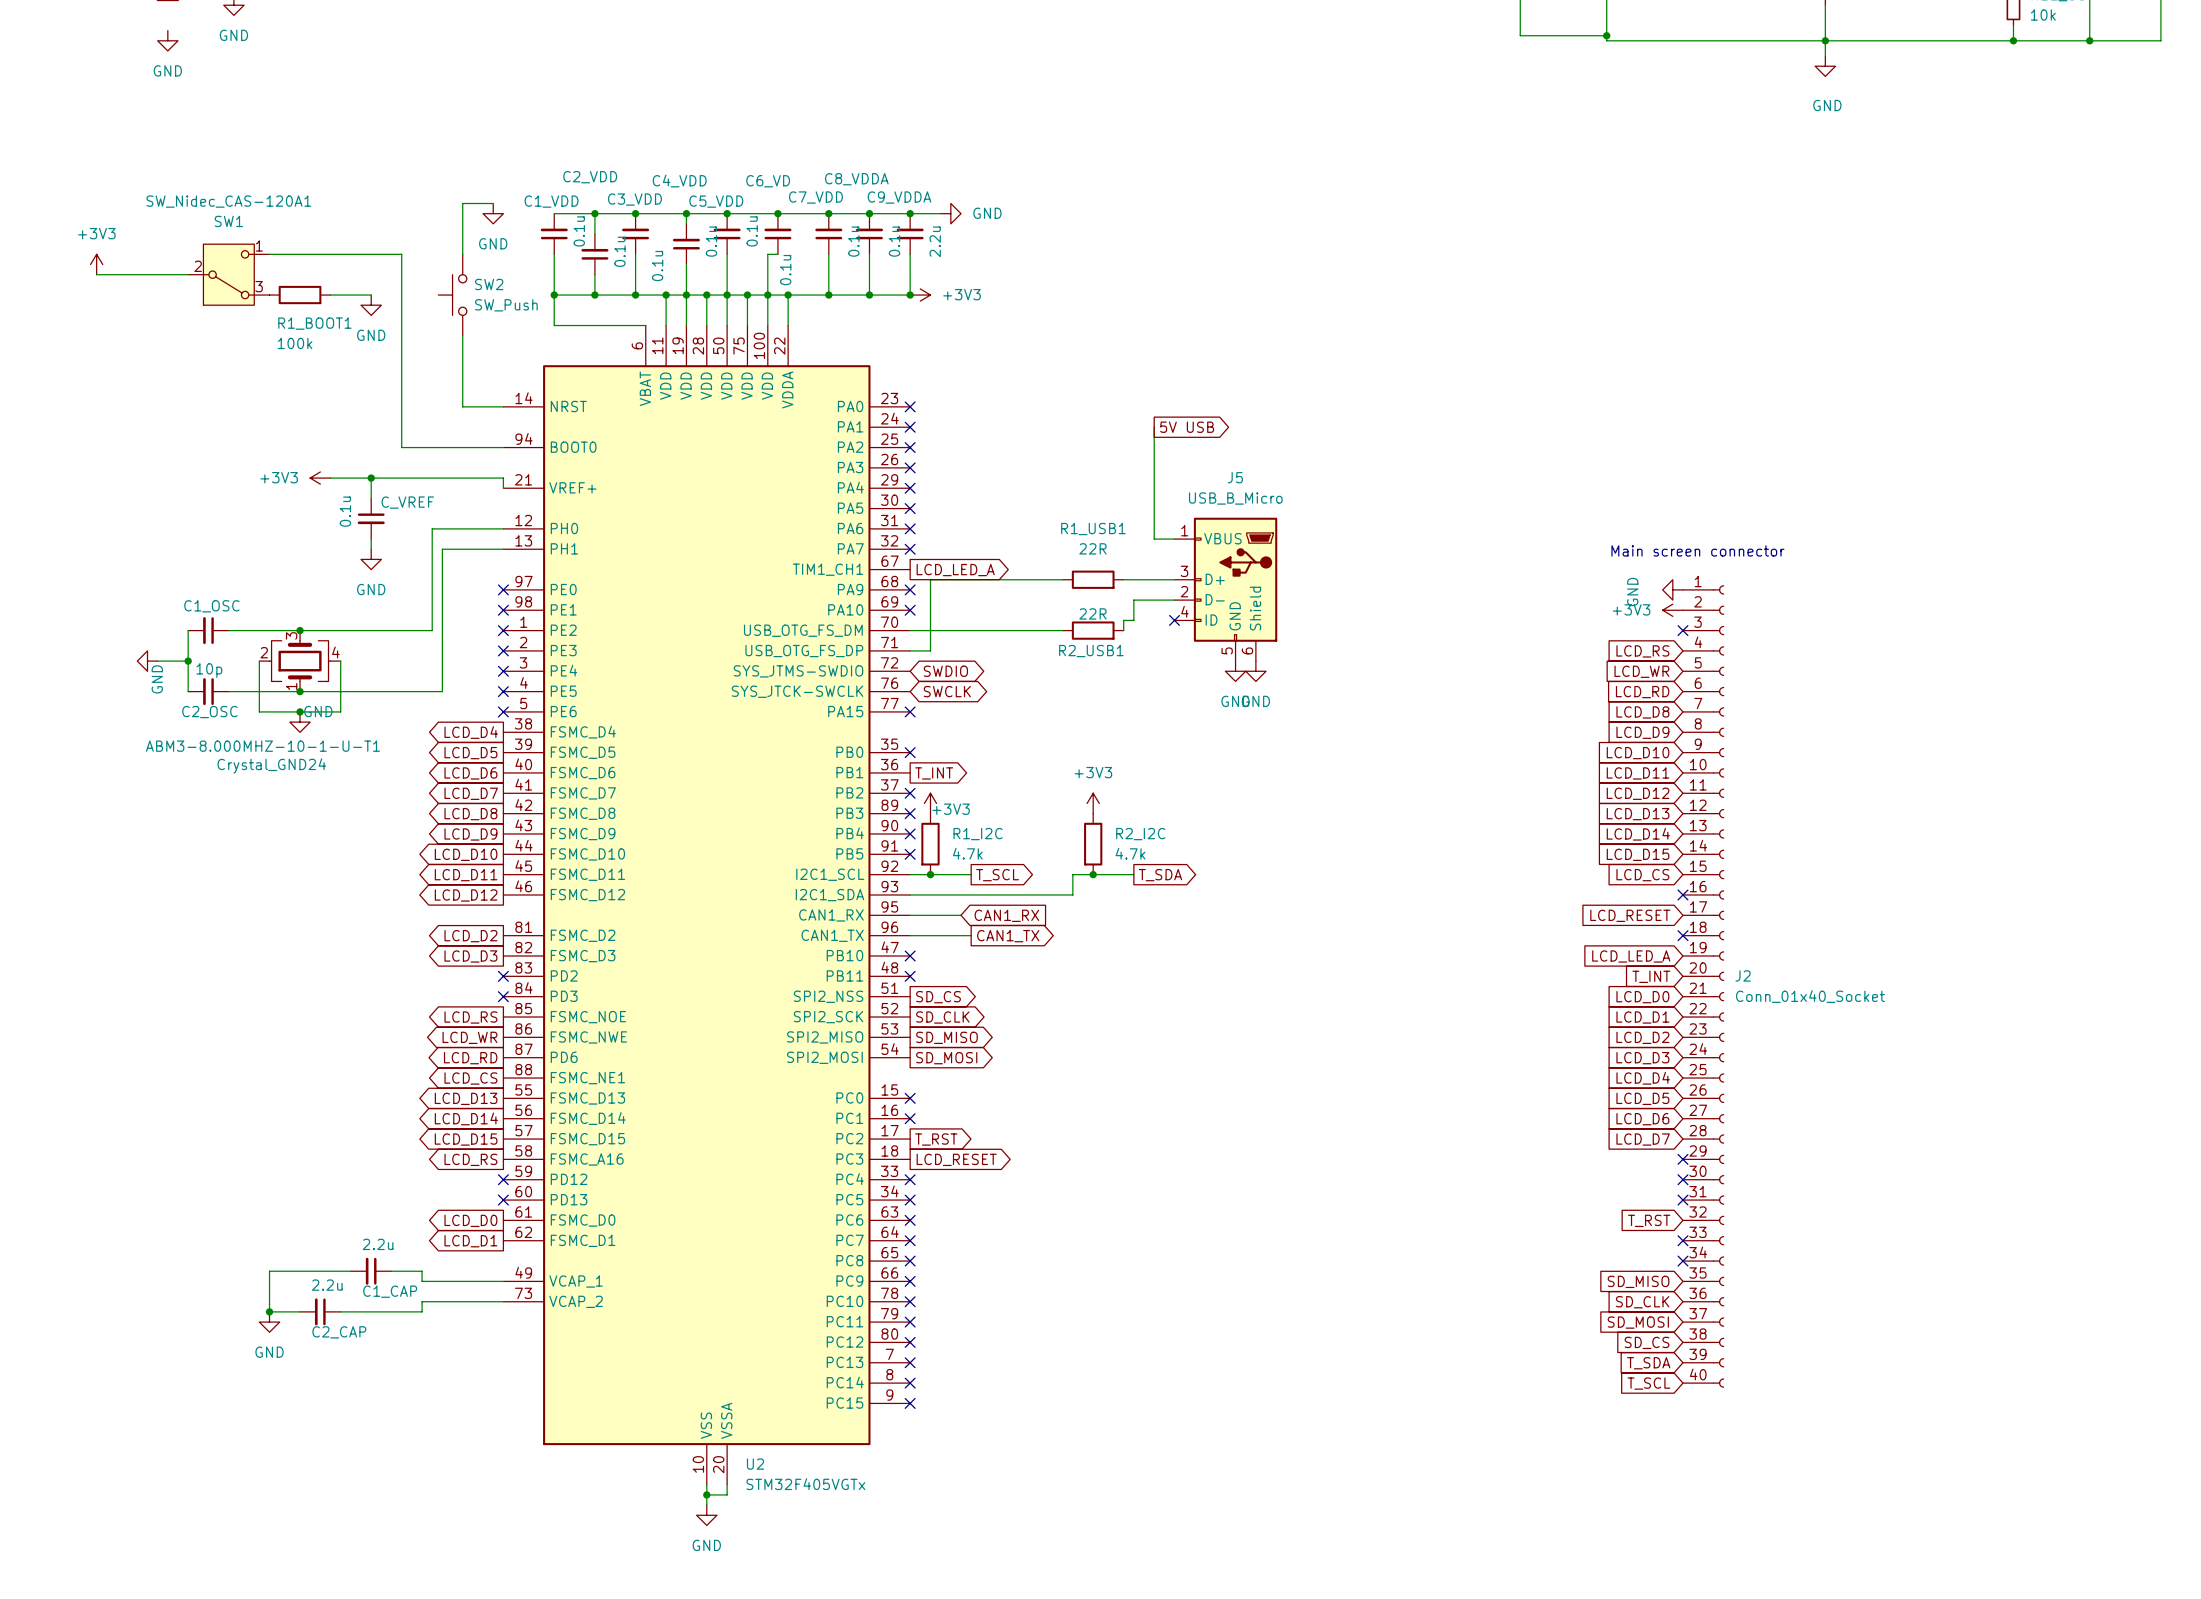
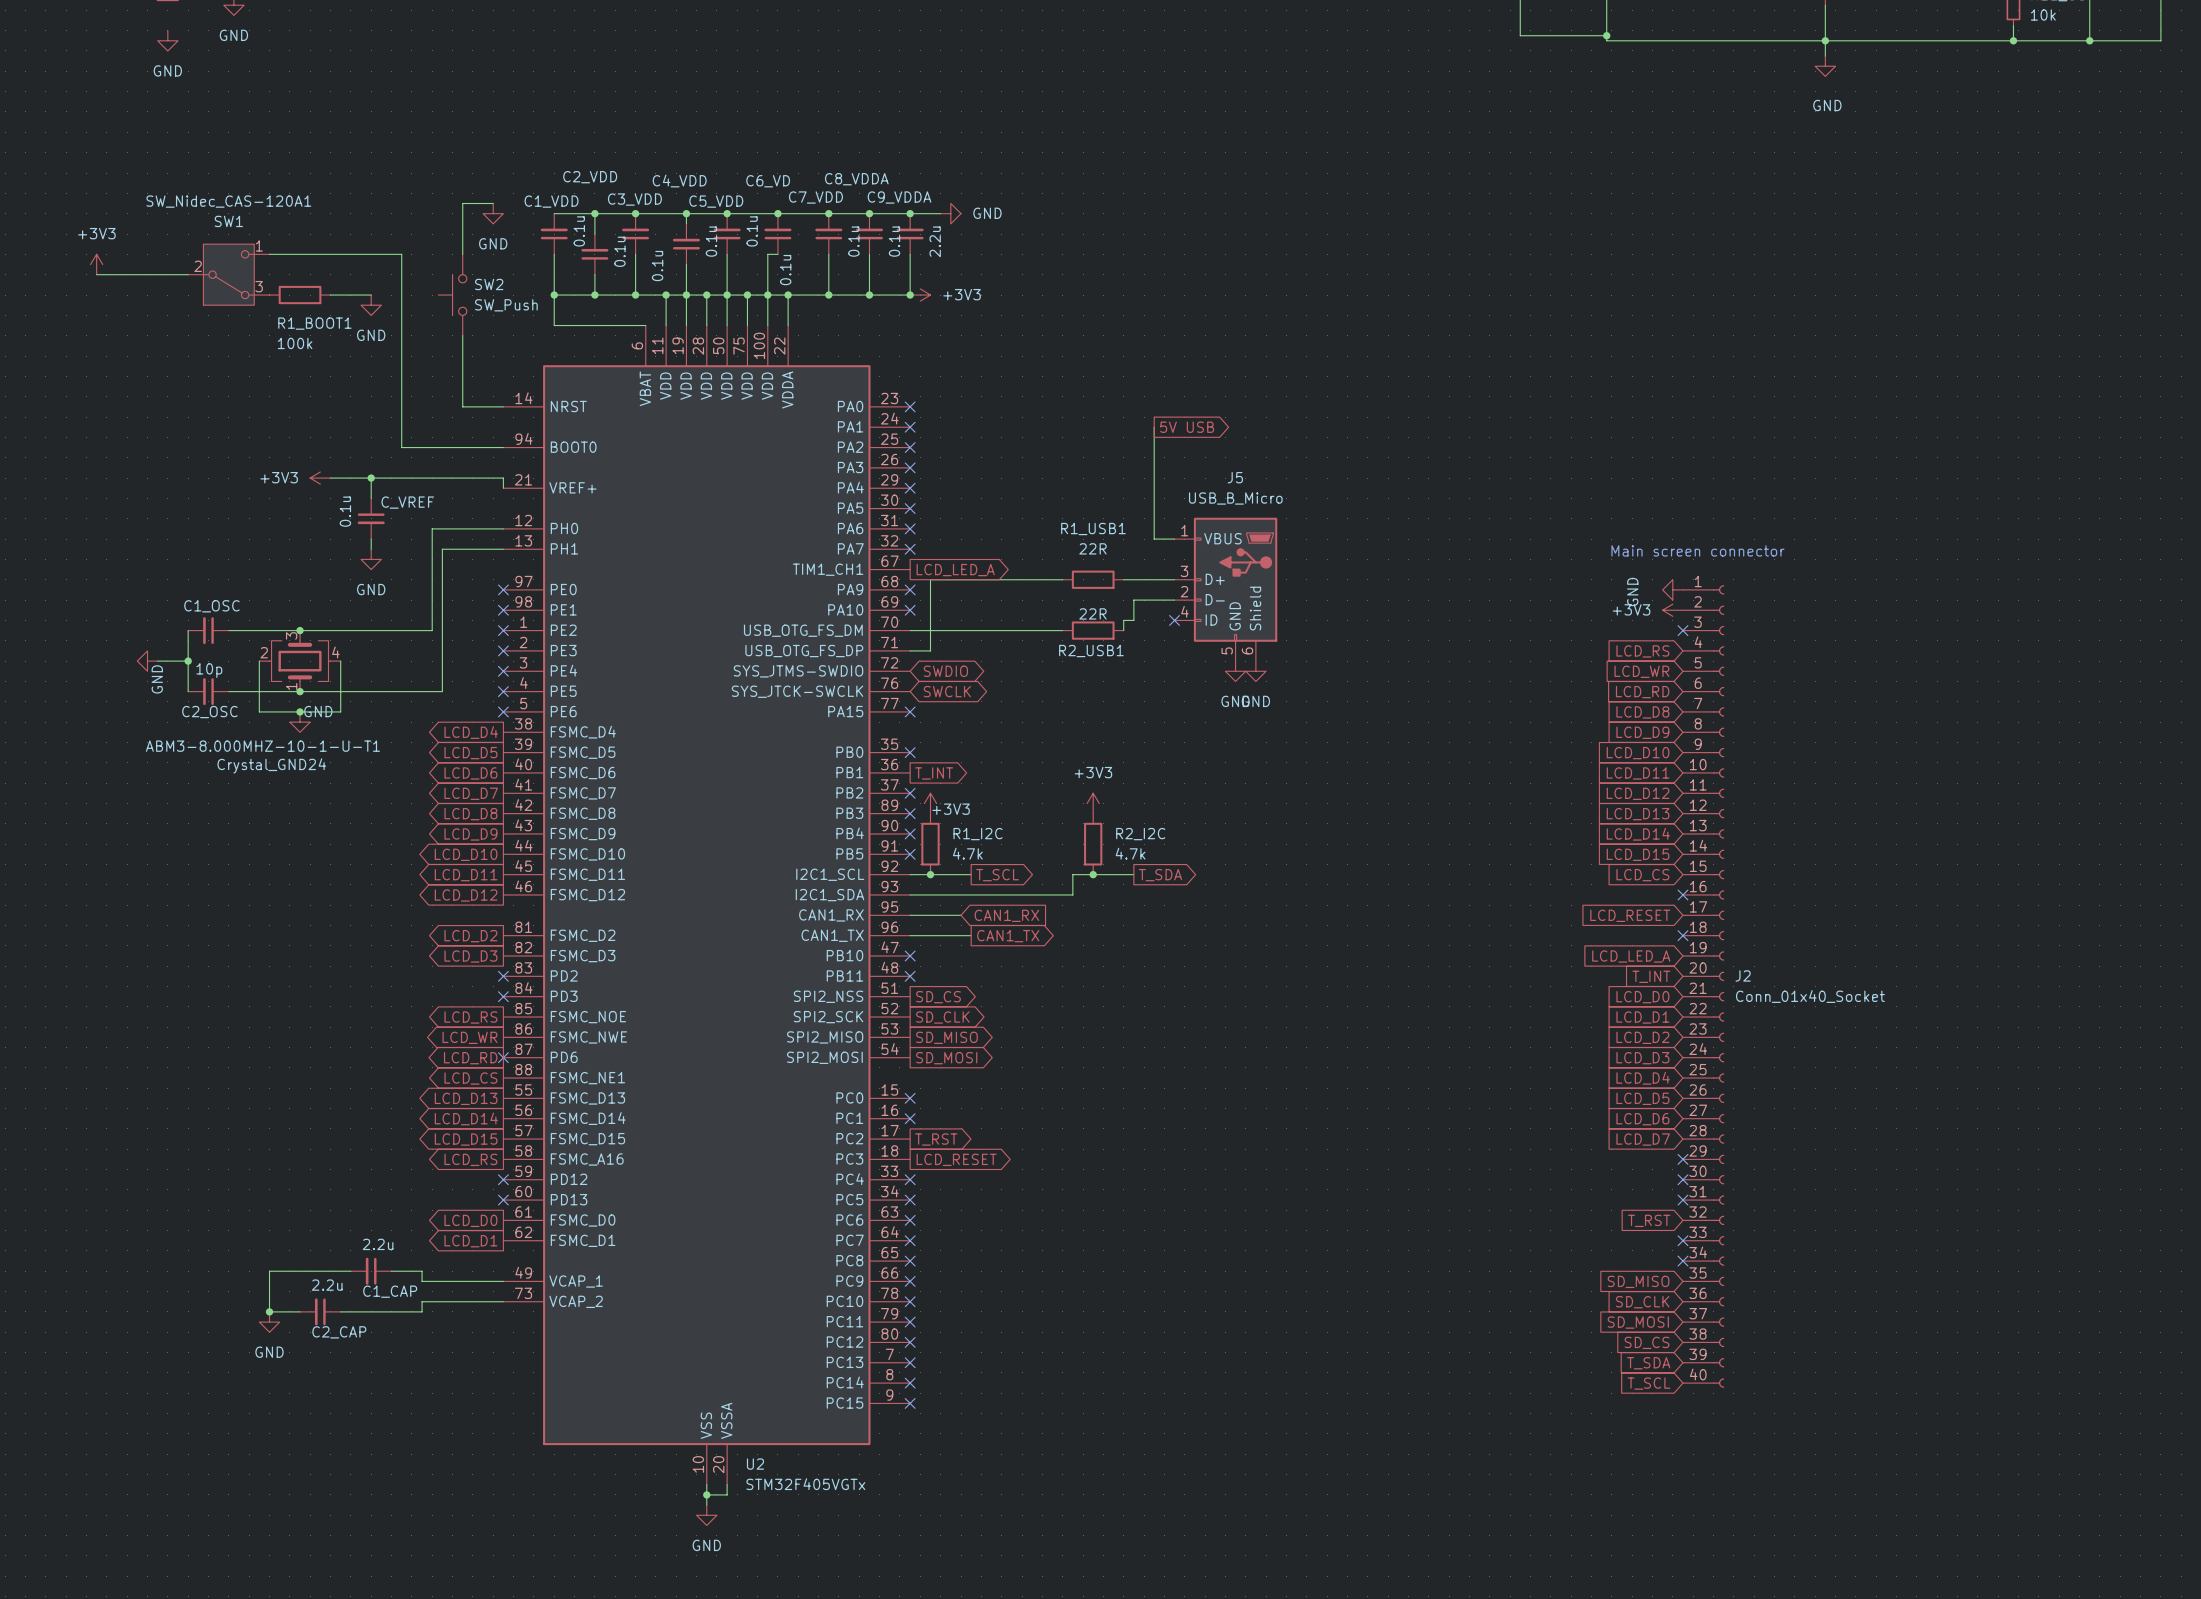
no-connect mark: none -> (503, 1057)

